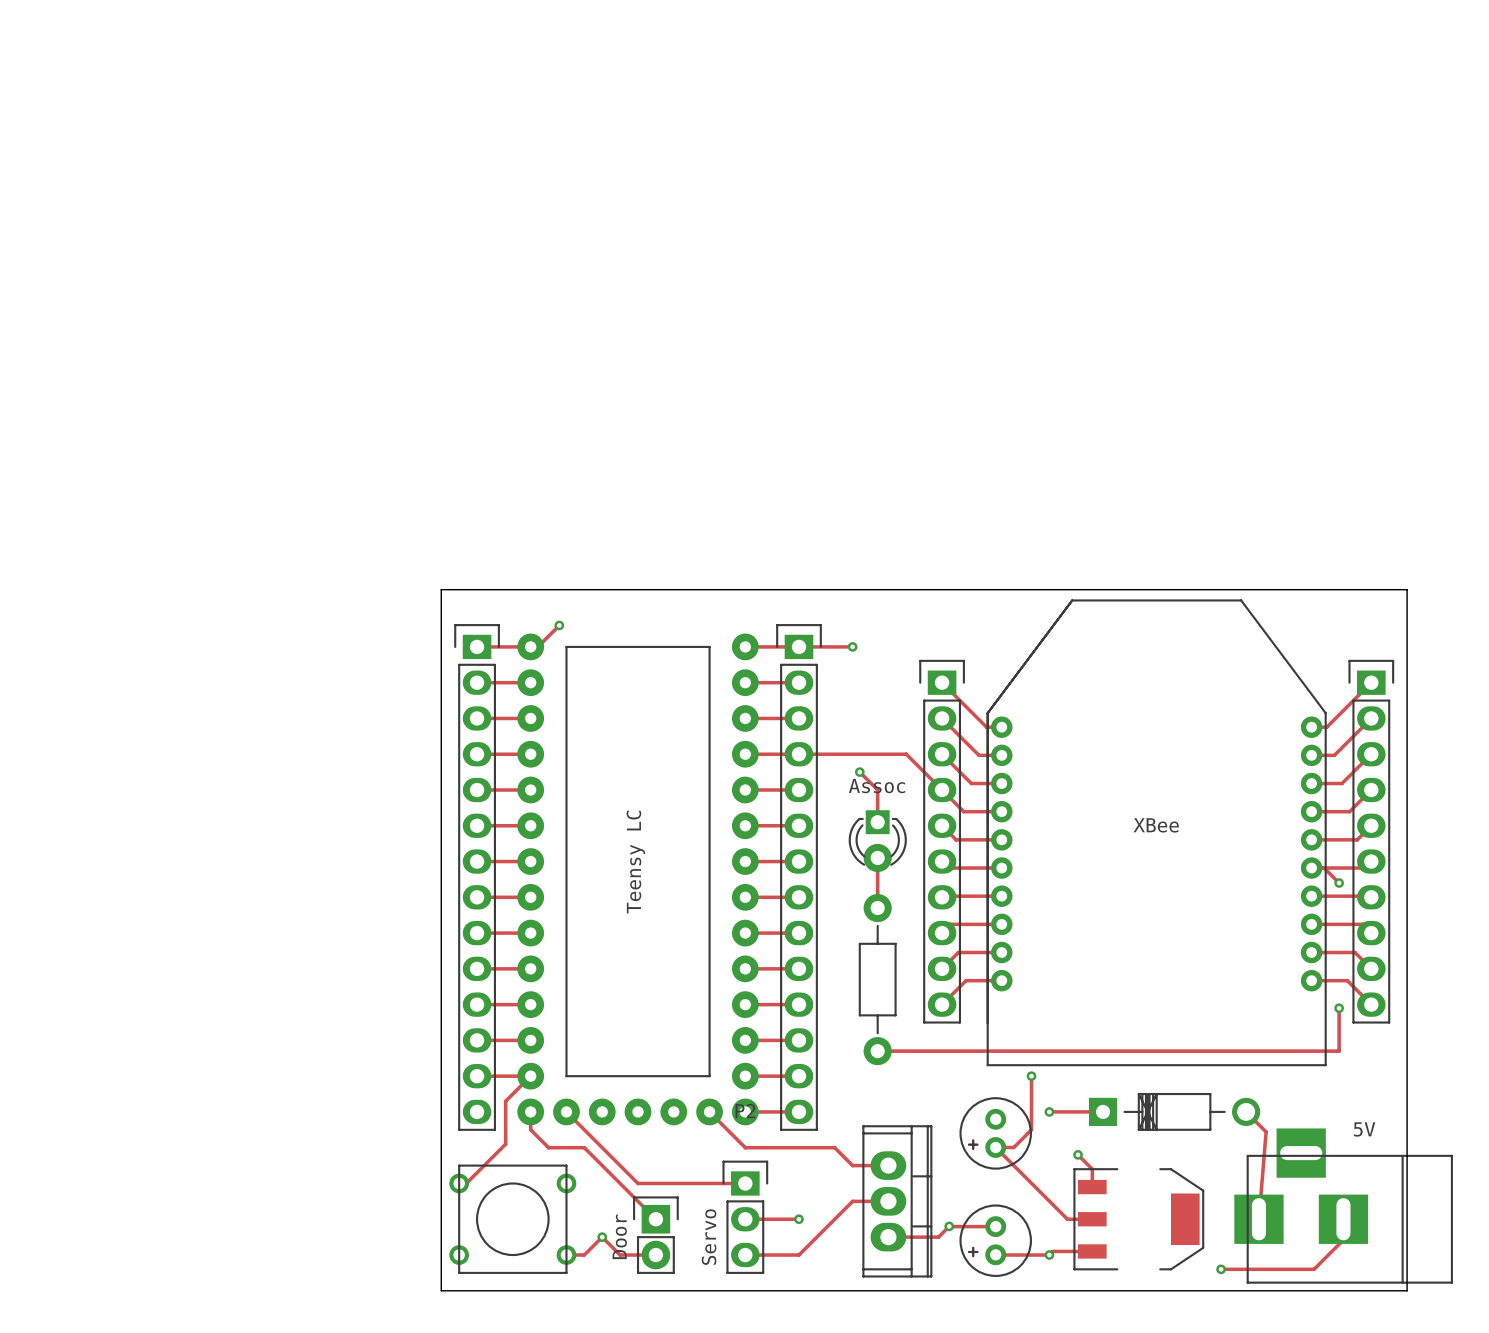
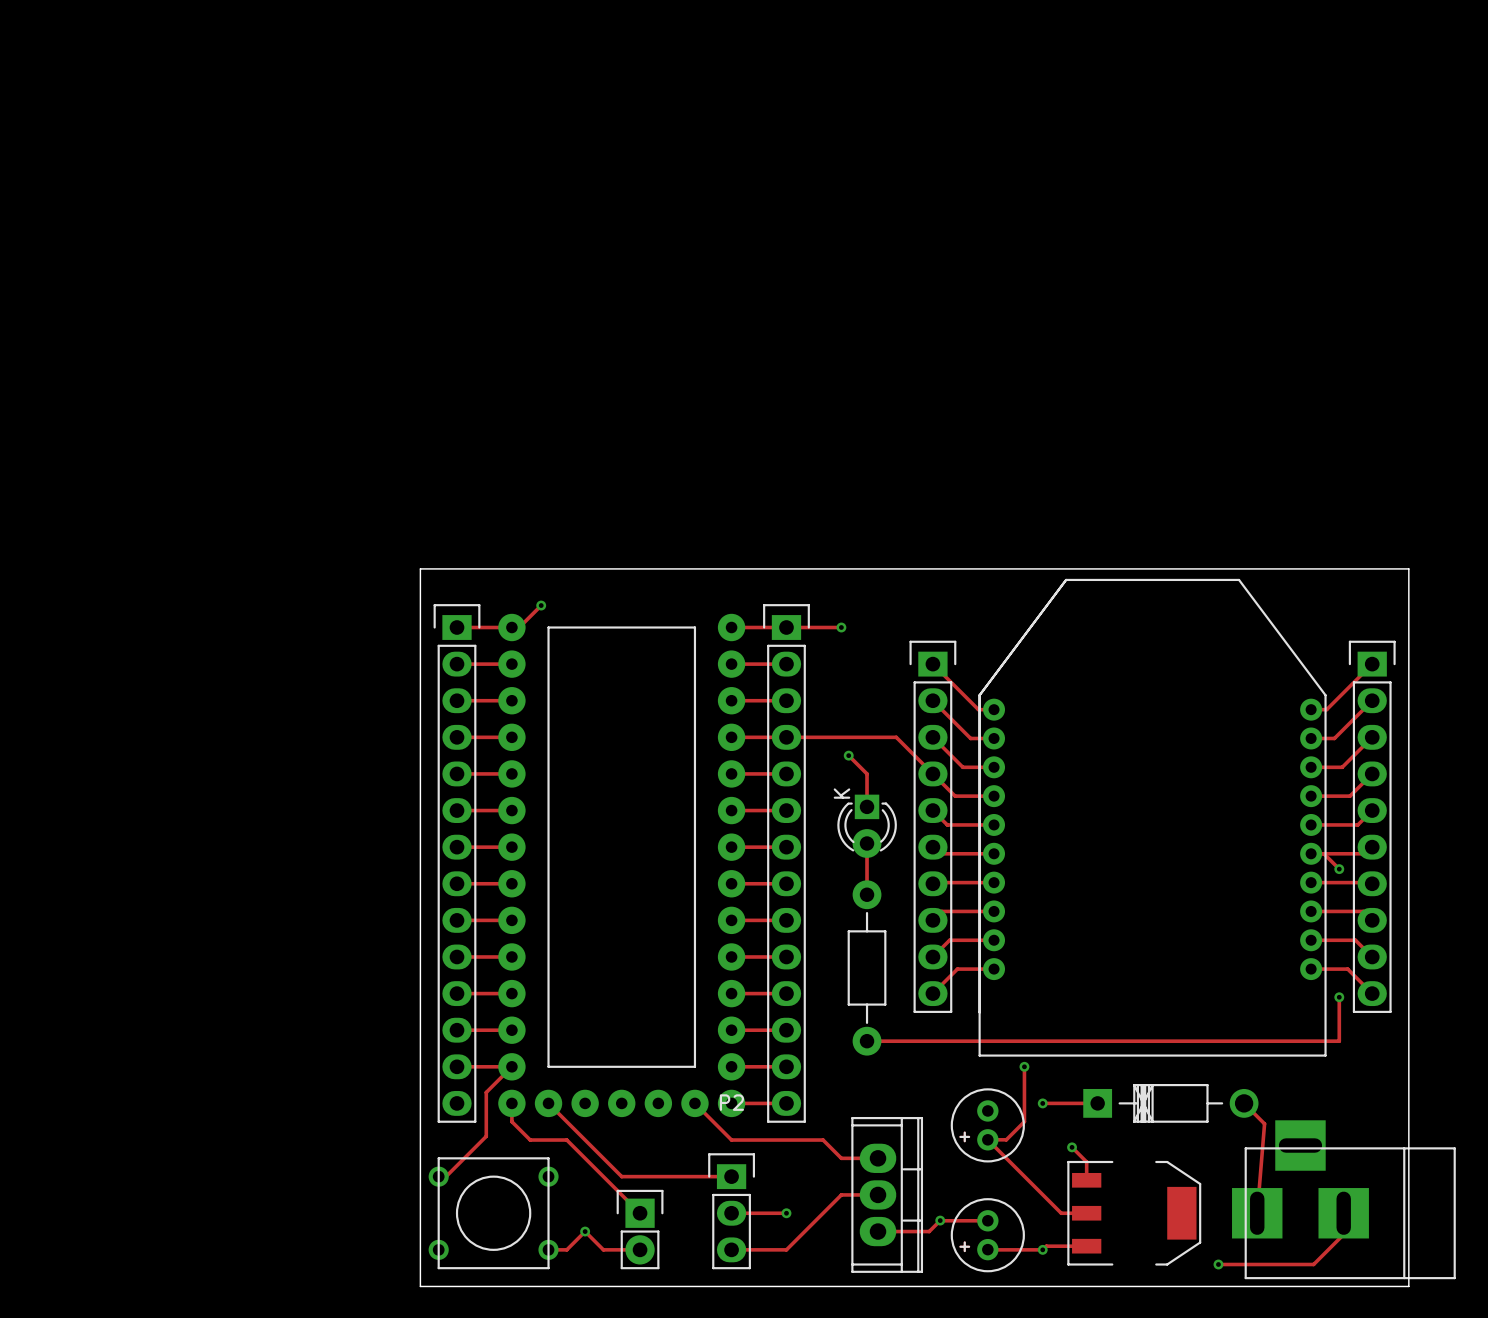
part value: Assoc (877, 786) -> none
part text: none -> K (841, 793)
part value: XBee (1156, 825) -> none
part value: Teensy LC (635, 862) -> none
part value: 5V (1364, 1129) -> none
part value: Door (619, 1236) -> none
P2 value: Servo (709, 1237) -> none

